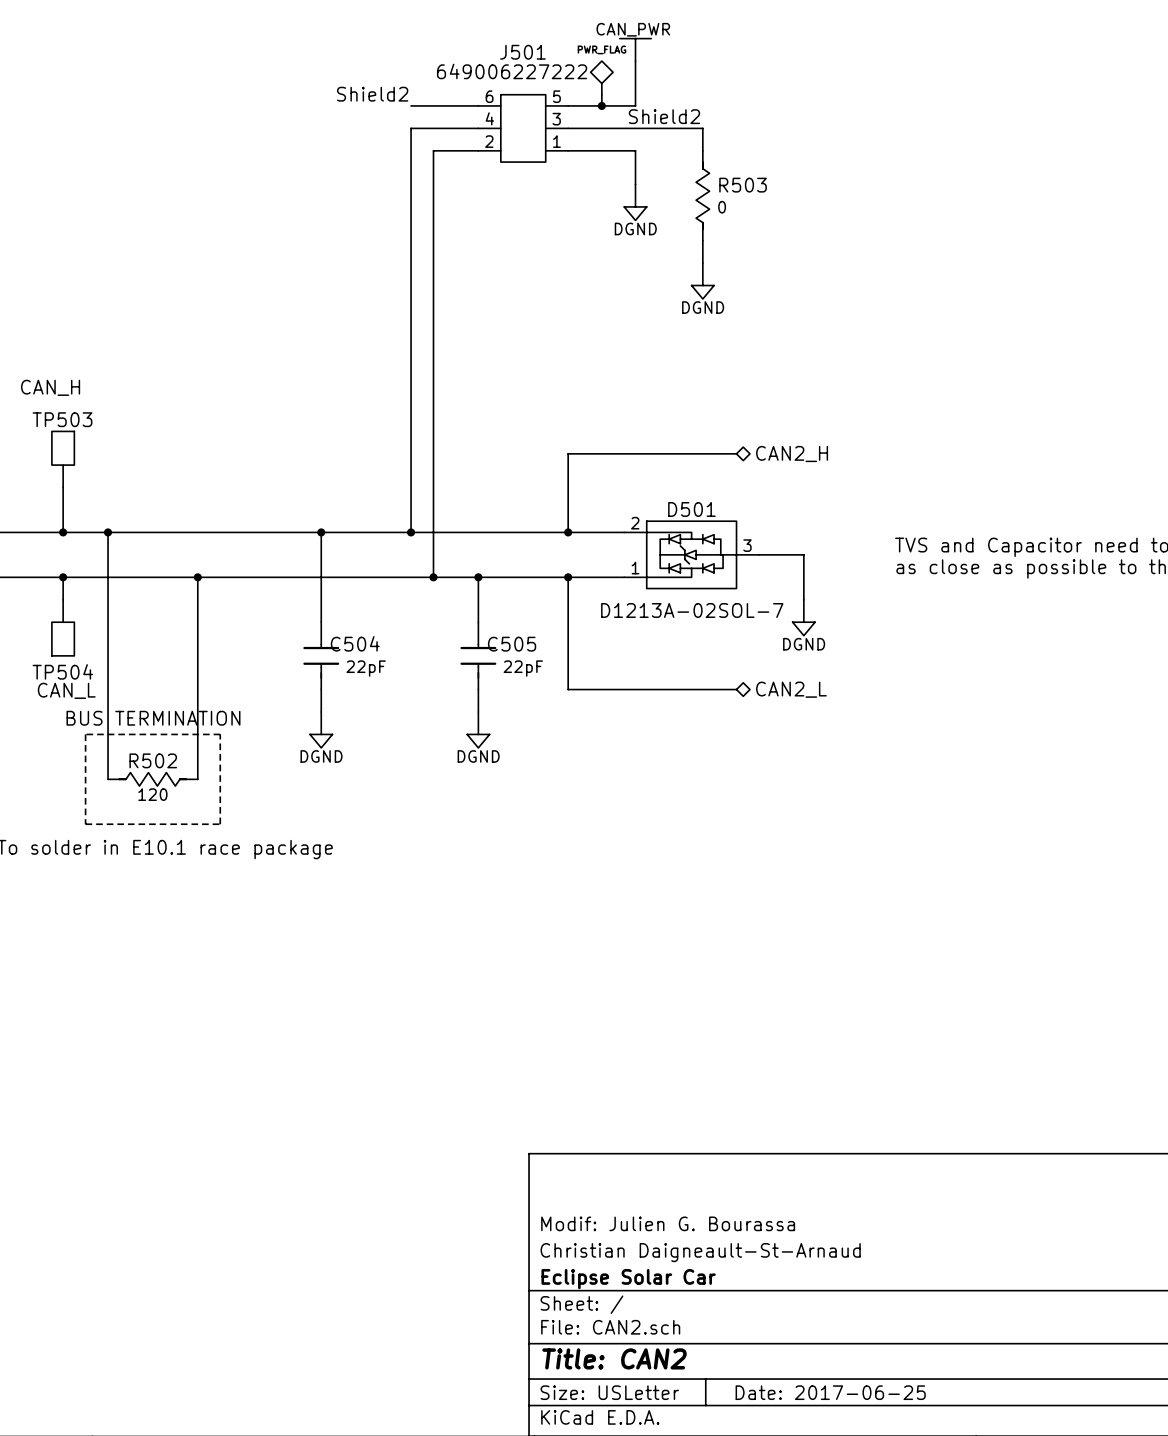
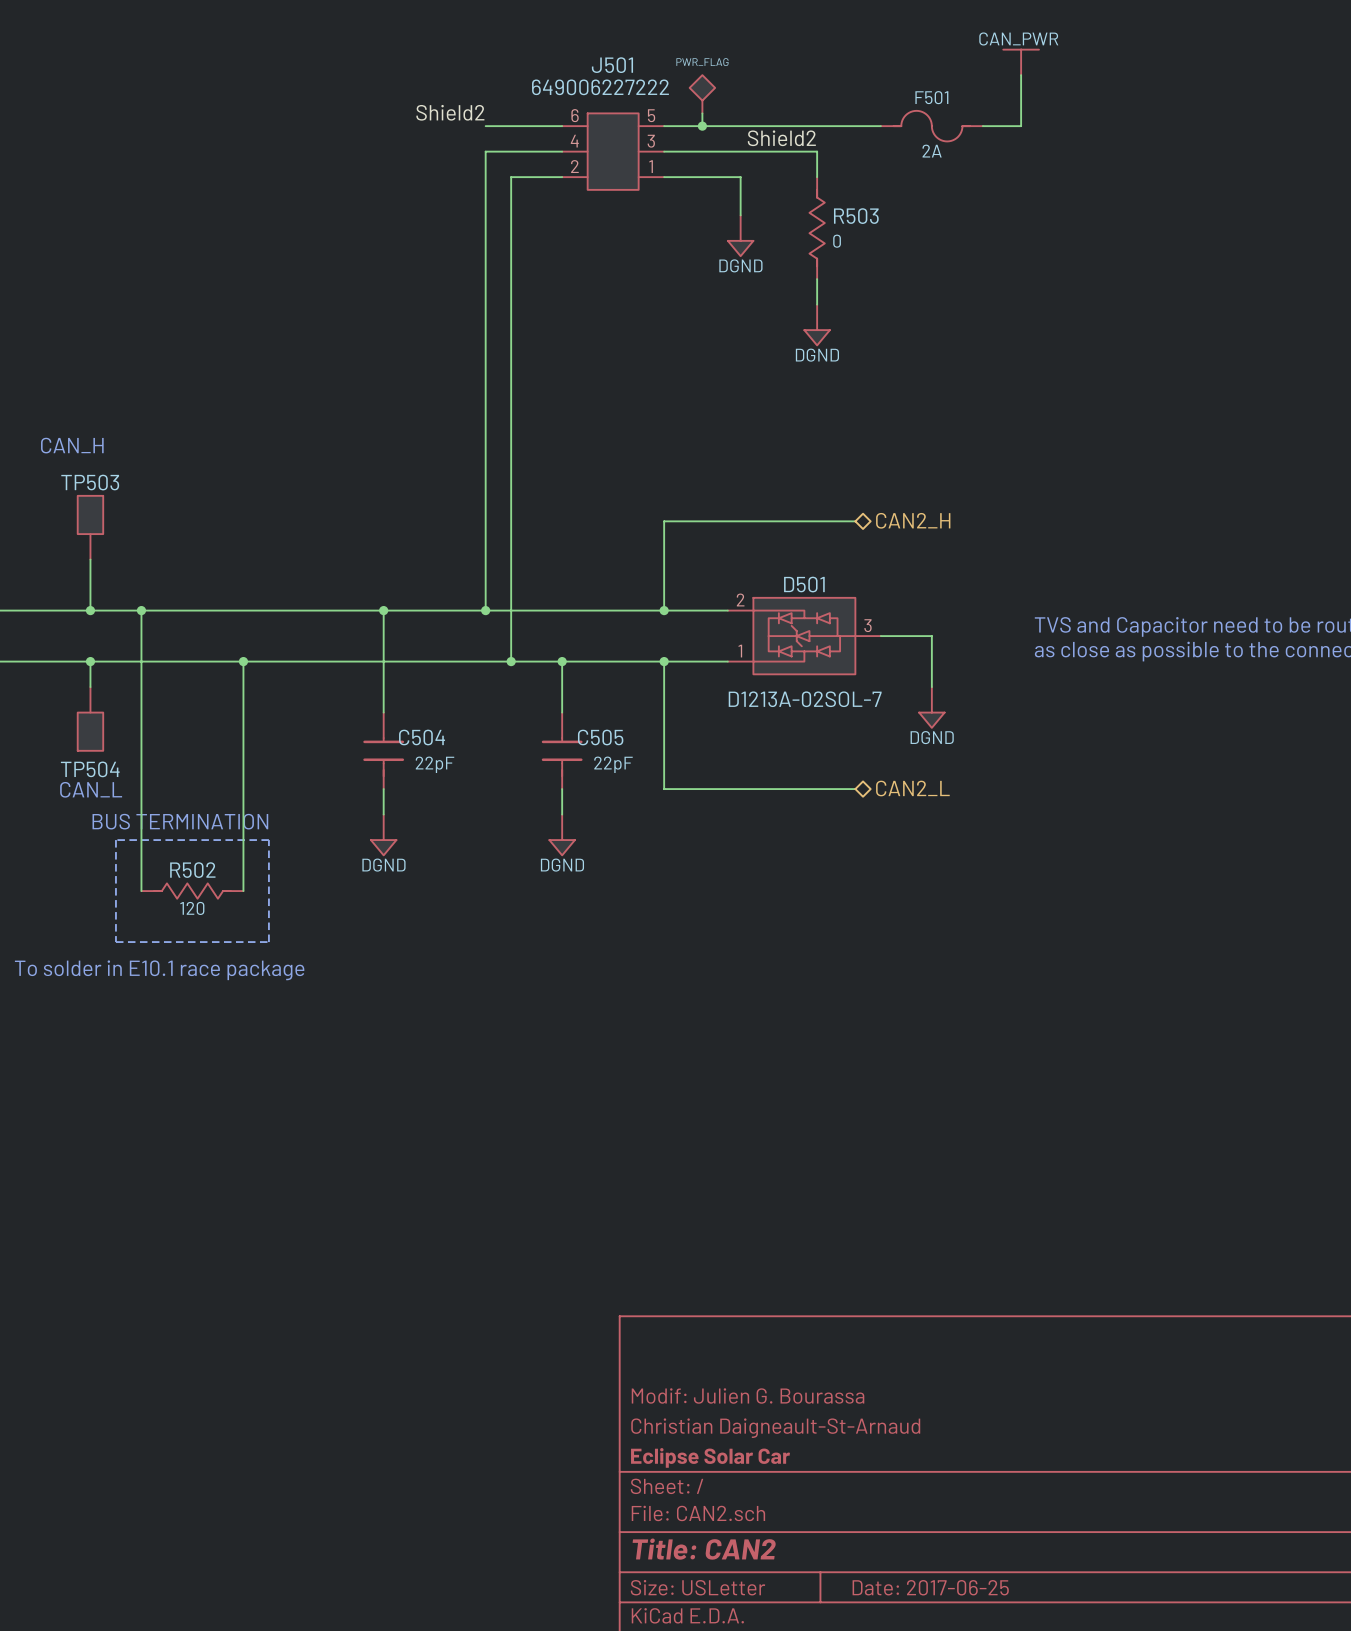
power symbol: CAN_PWR (635, 49) -> none
power symbol: none -> CAN_PWR (1021, 62)
wire: (635, 61) (635, 105) -> (880, 126) (740, 126)
wire: none -> (1021, 75) (1021, 126) (982, 126)
F501: none -> (931, 126)

